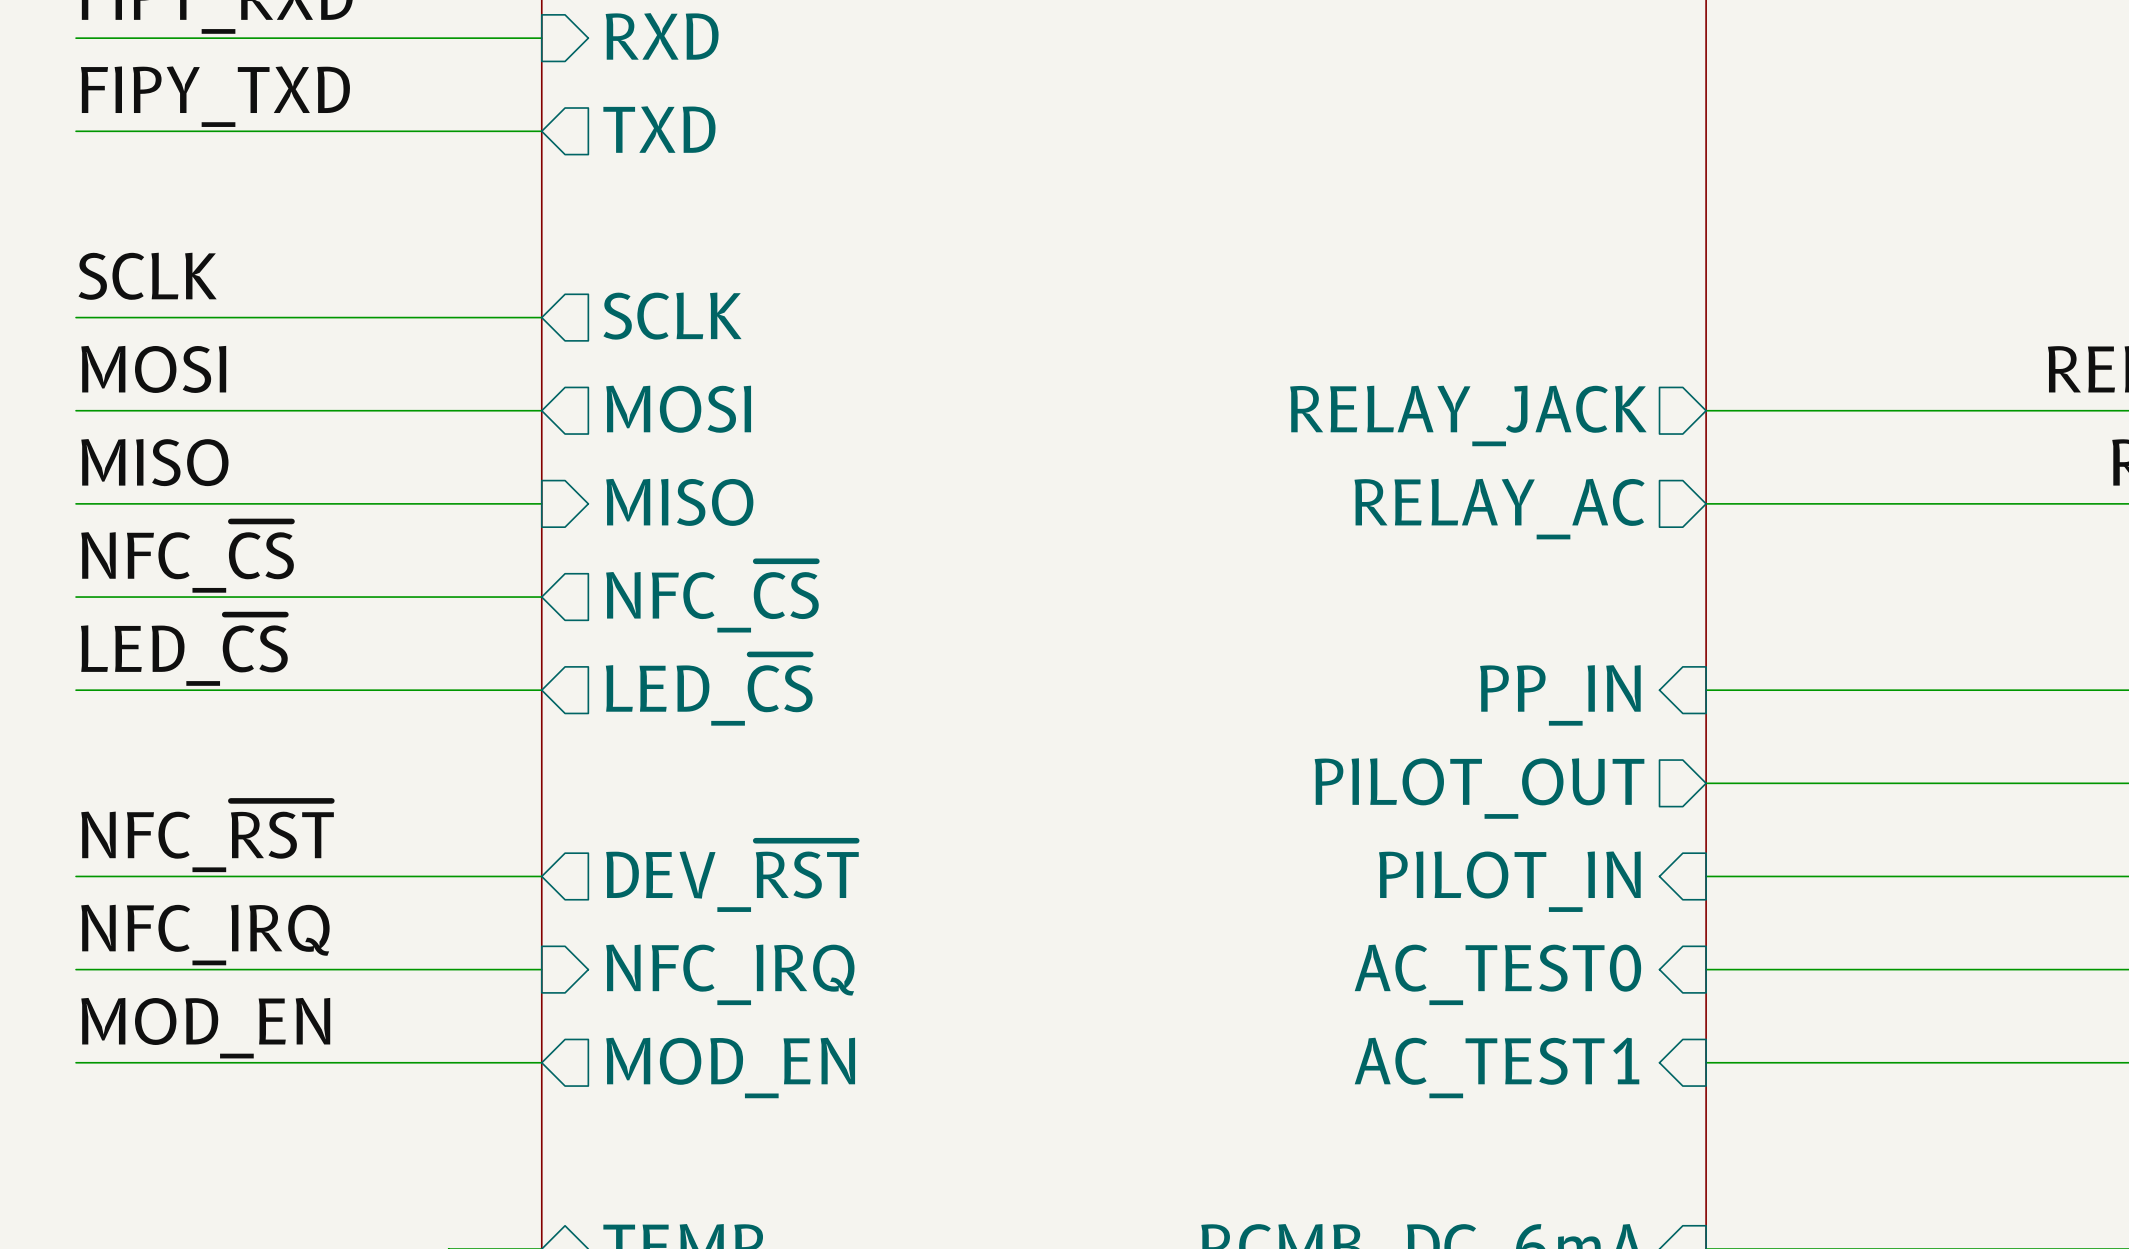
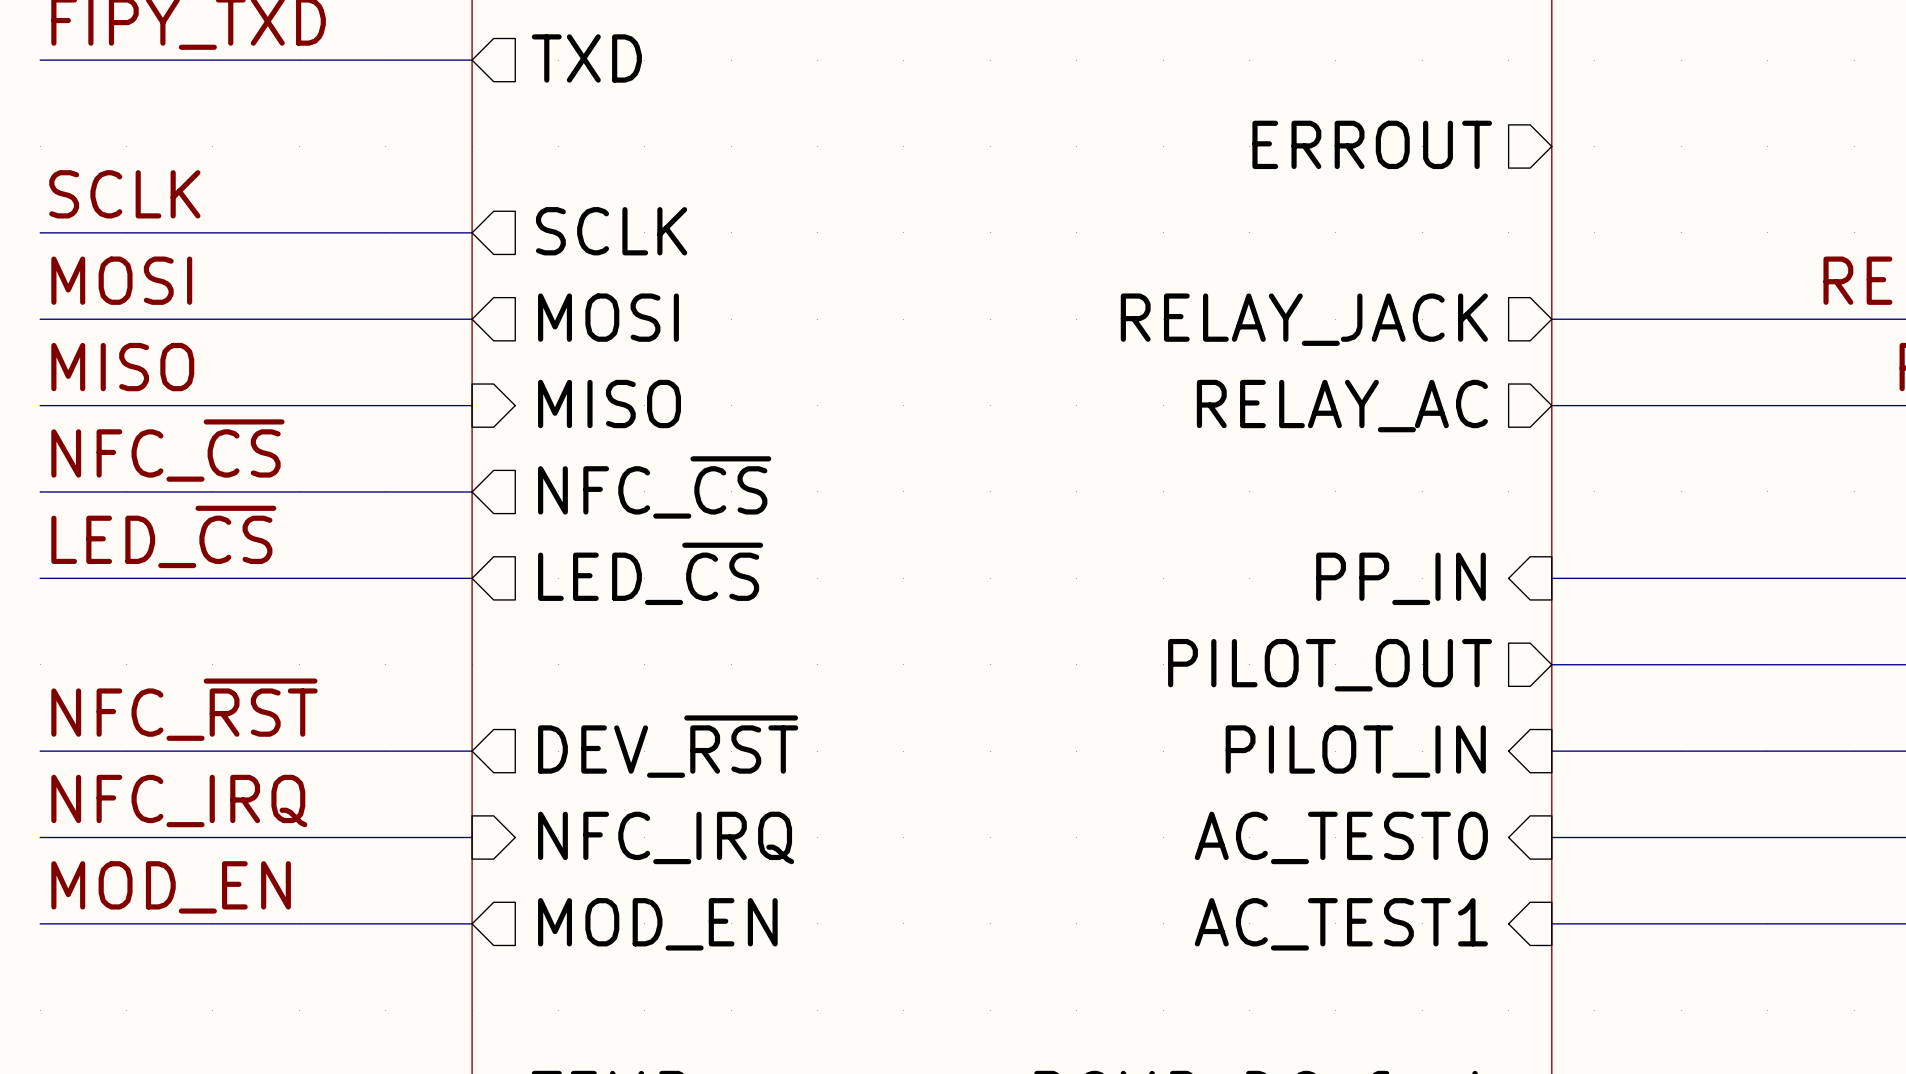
sheet pin: none -> ERROUT (1372, 144)

